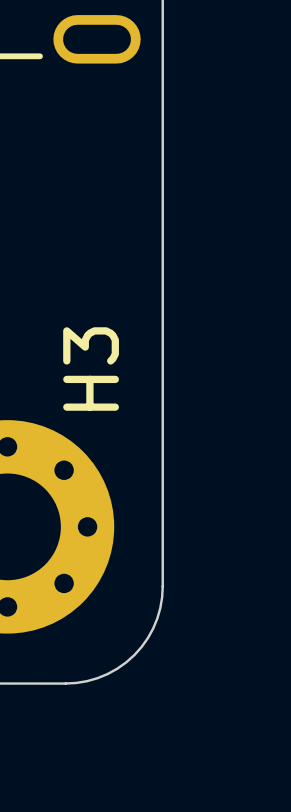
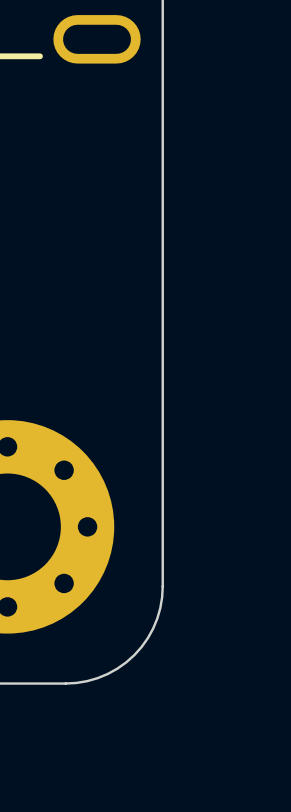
H3 name: H3 (91, 369) -> none

